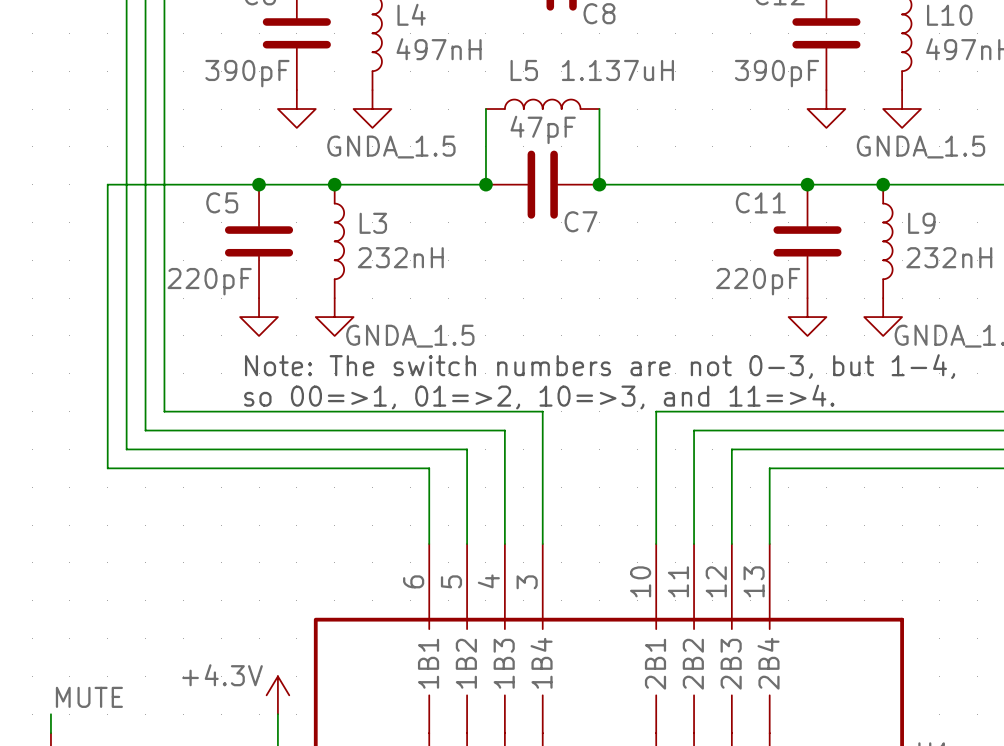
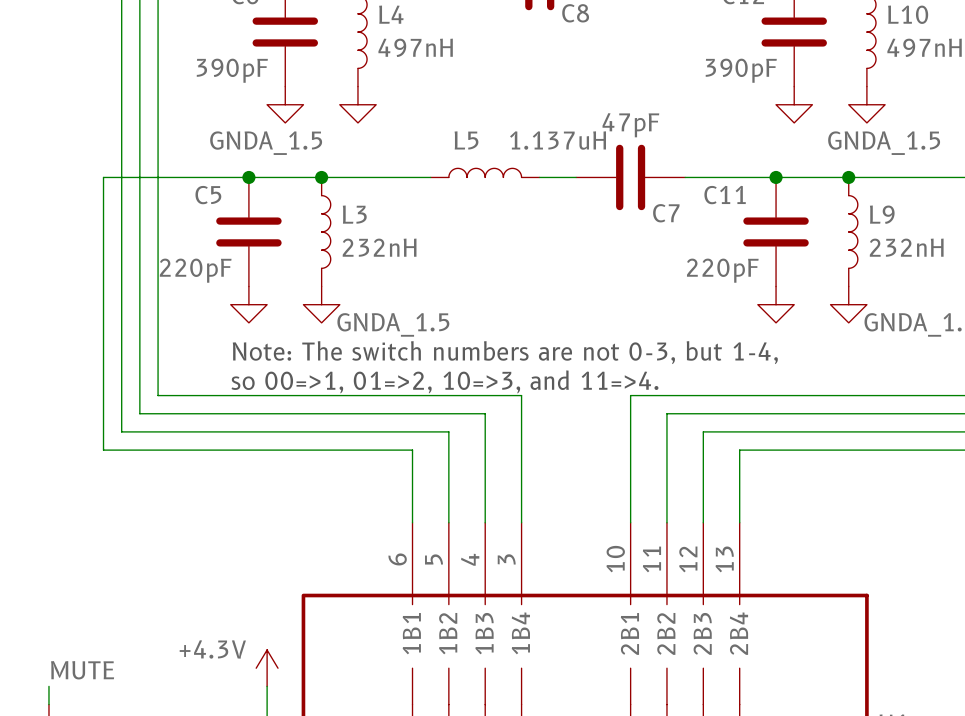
L5 position: (542, 104) -> (485, 172)
wire: (485, 109) (485, 184) (448, 184) -> none
wire: (599, 109) (599, 184) (712, 184) -> none
power symbol text position: GNDA_1.5 (391, 147) -> GNDA_1.5 (266, 143)
junction: (485, 184) -> none
C7 position: (542, 184) -> (630, 177)
junction: (599, 184) -> none

